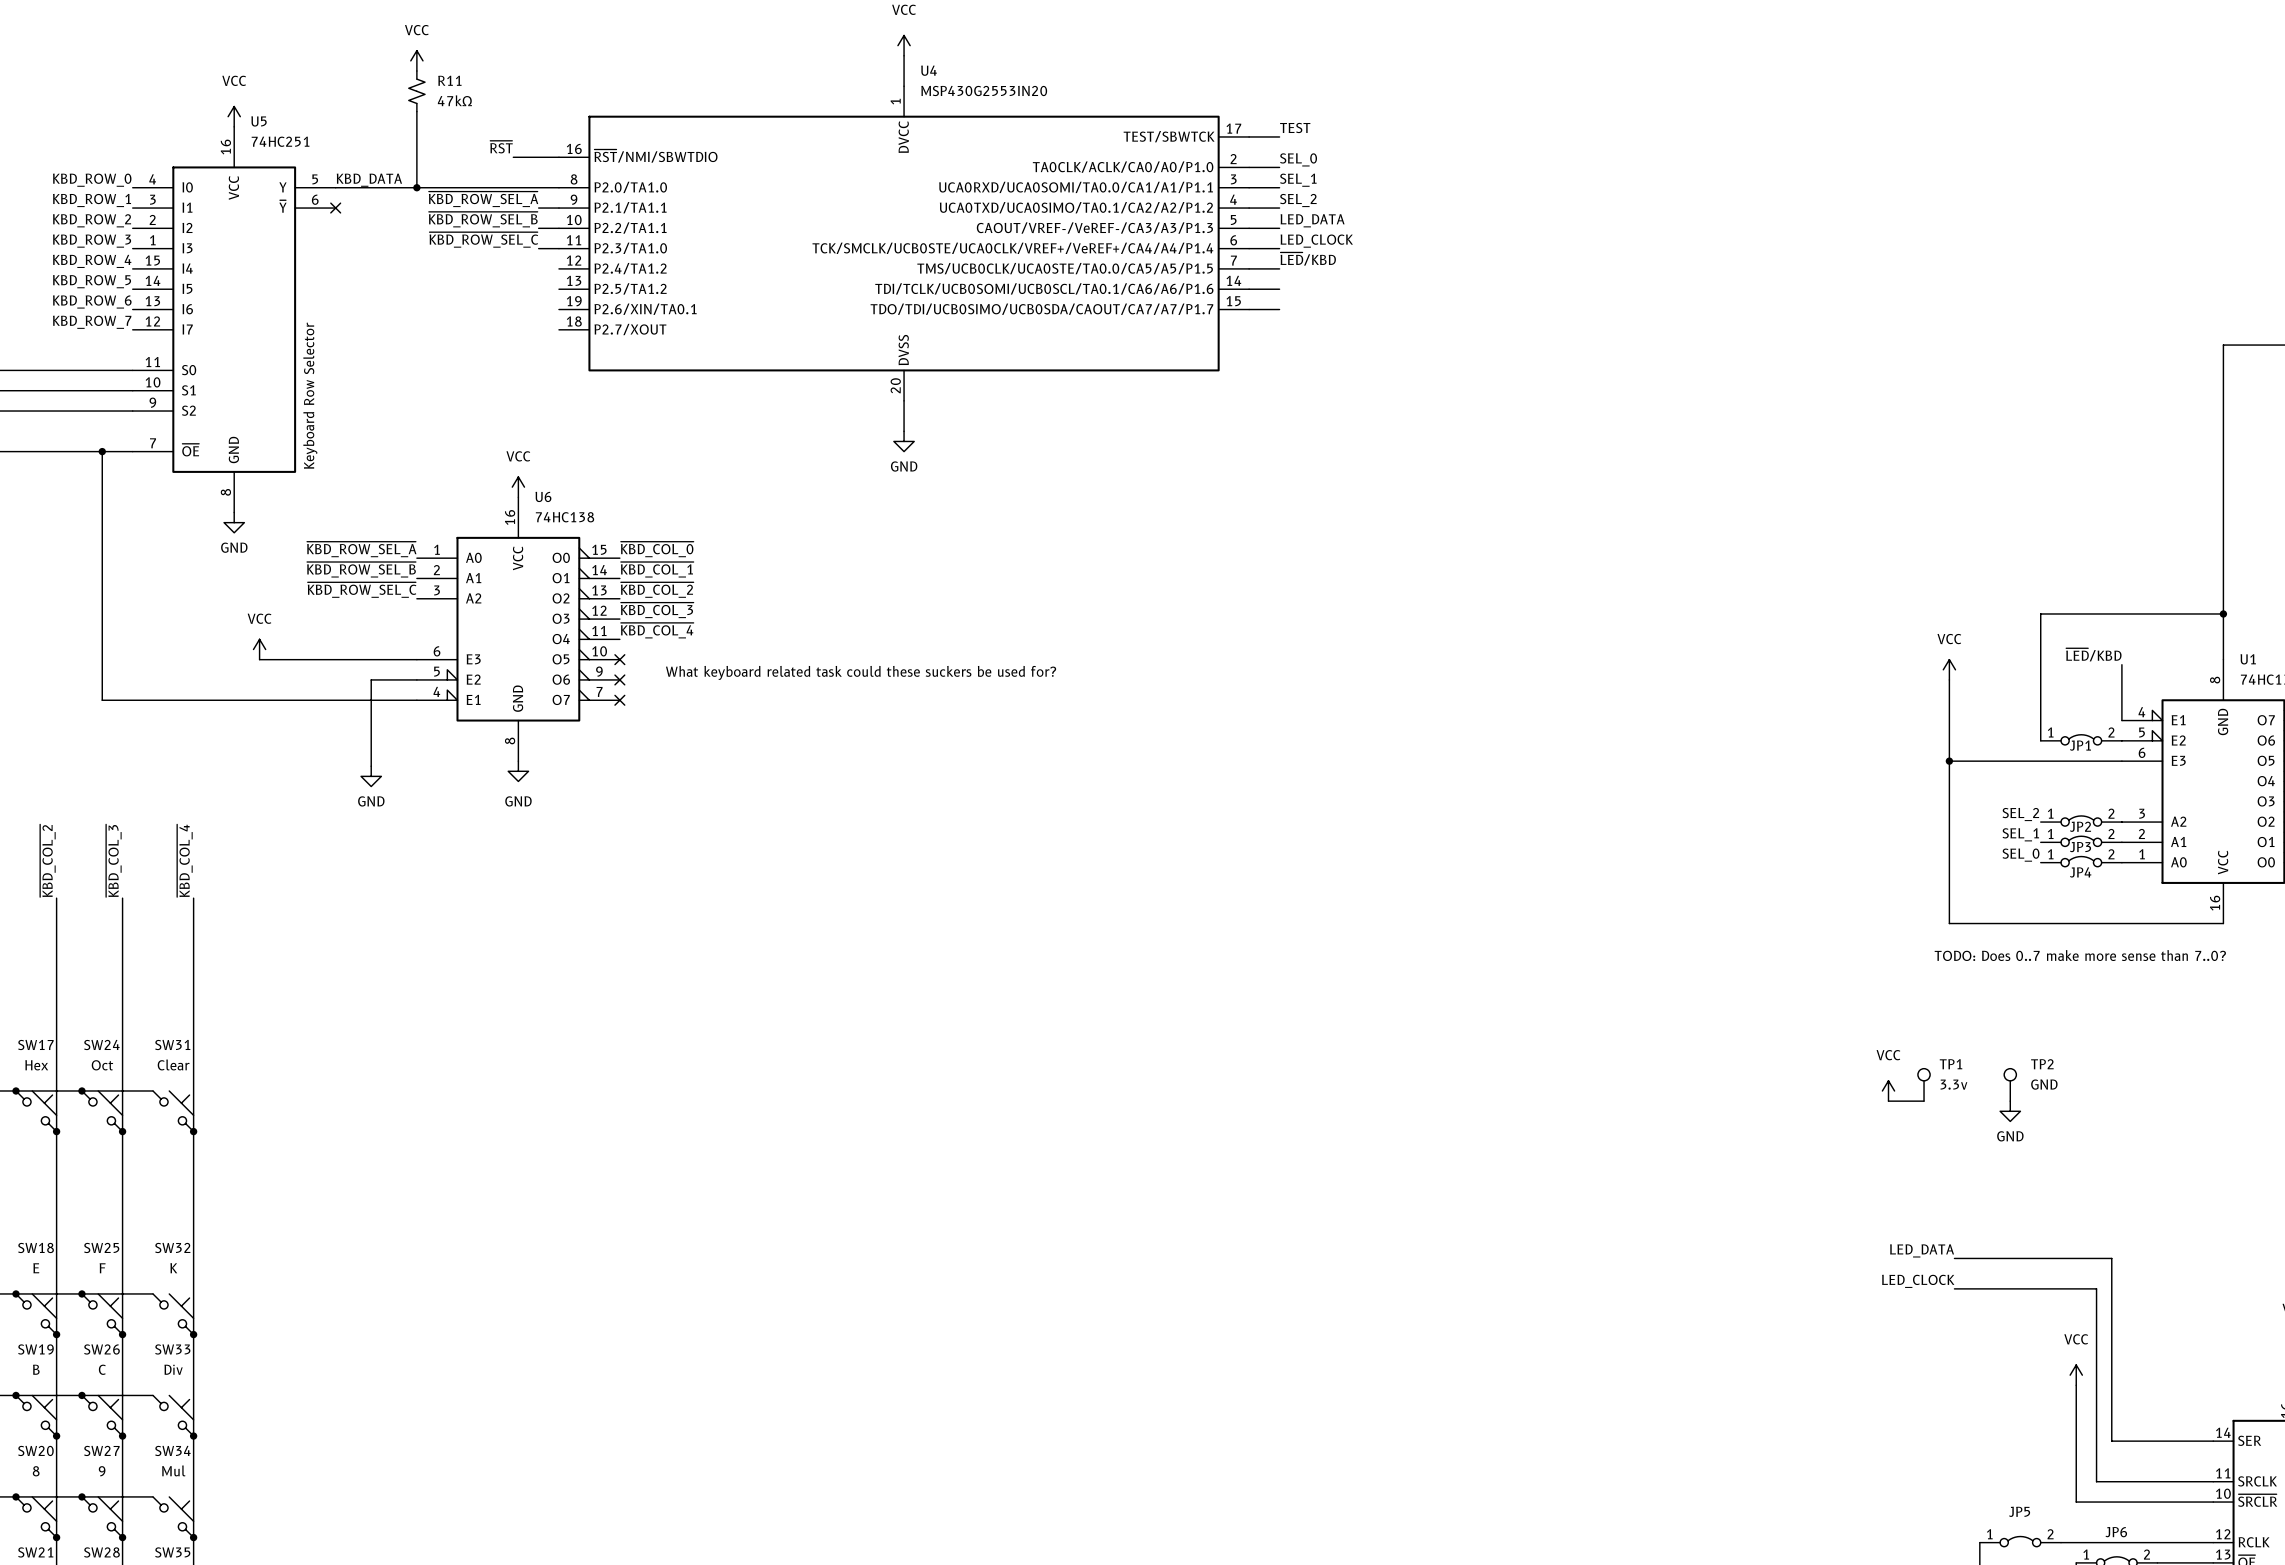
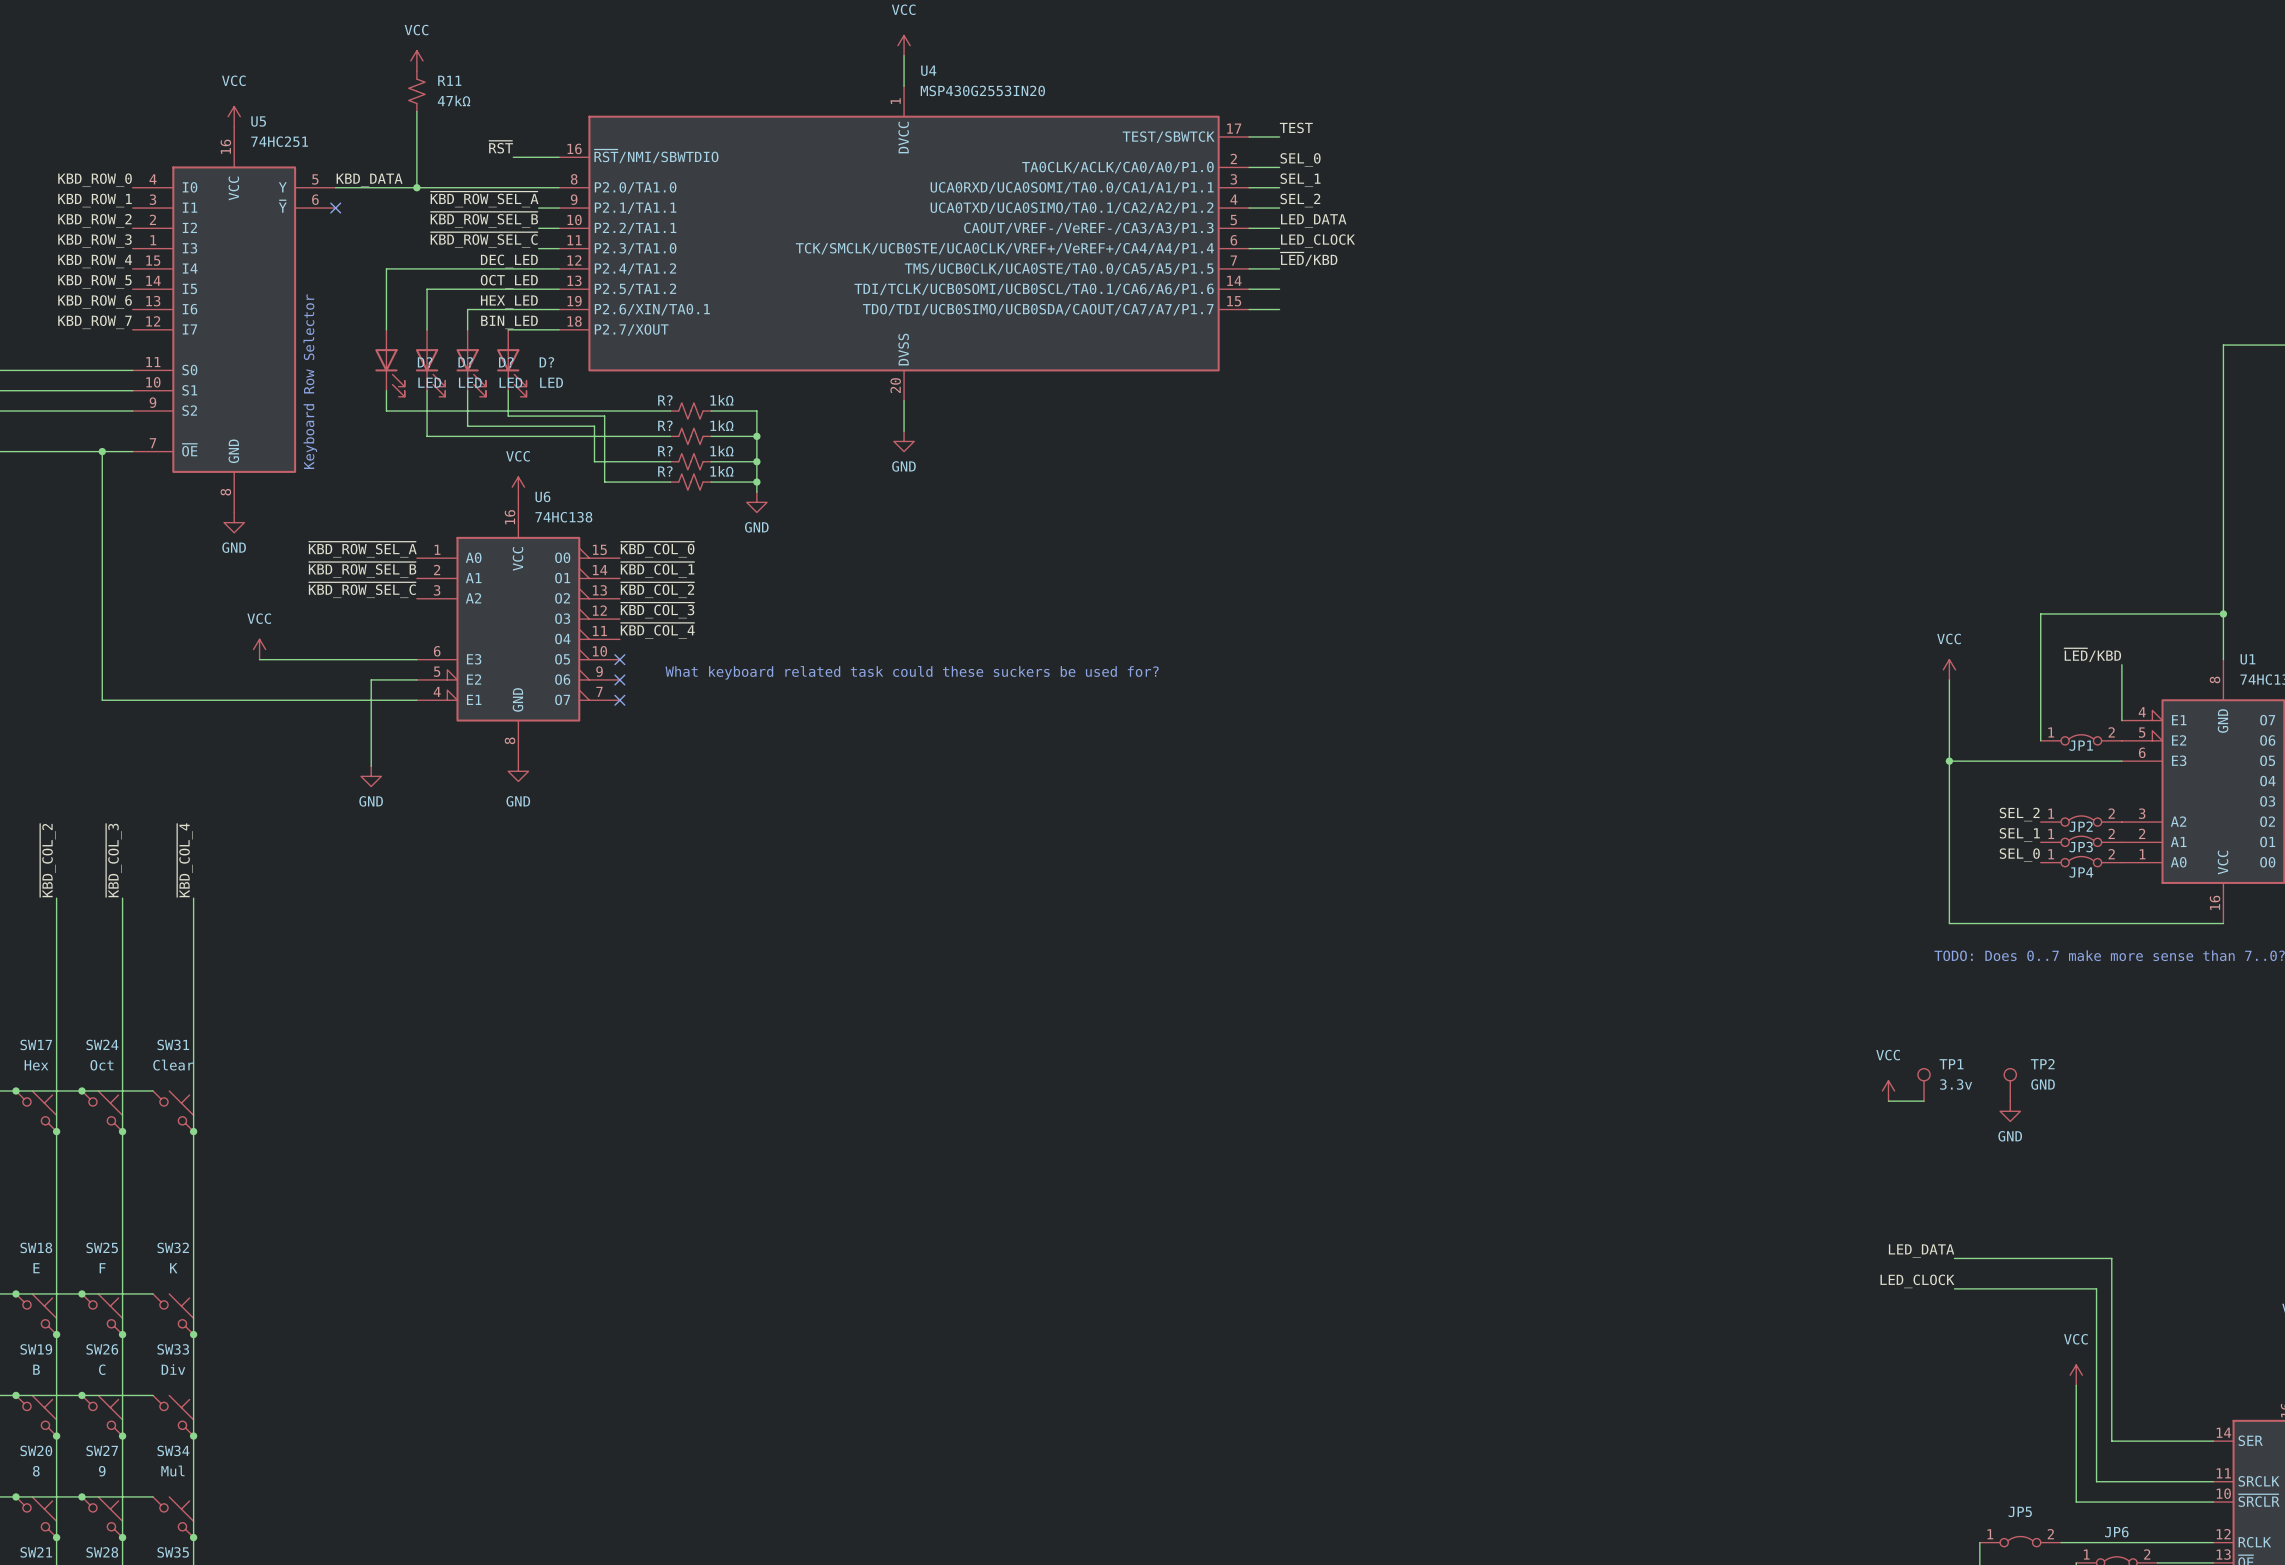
label: none -> DEC_LED (509, 261)
wire: none -> (558, 268) (386, 268) (386, 329)
label: none -> OCT_LED (509, 281)
wire: none -> (558, 289) (427, 289) (427, 329)
label: none -> HEX_LED (509, 302)
wire: none -> (558, 309) (467, 309) (467, 329)
label: none -> BIN_LED (509, 322)
wire: none -> (508, 329) (558, 329)
D?: none -> LED (389, 363)
D?: none -> LED (430, 363)
D?: none -> LED (471, 363)
D?: none -> LED (511, 363)
wire: none -> (386, 390) (386, 411) (670, 411)
wire: none -> (427, 390) (427, 436) (670, 436)
wire: none -> (467, 390) (467, 426) (594, 426) (594, 461) (670, 461)
wire: none -> (508, 390) (508, 416) (604, 416) (604, 482) (670, 482)
R?: none -> 1kΩ (690, 411)
wire: none -> (711, 411) (756, 411) (756, 492)
R?: none -> 1kΩ (690, 436)
wire: none -> (711, 436) (756, 436)
junction: none -> (756, 436)
R?: none -> 1kΩ (690, 461)
wire: none -> (711, 461) (756, 461)
junction: none -> (756, 461)
R?: none -> 1kΩ (690, 482)
wire: none -> (711, 482) (756, 482)
junction: none -> (756, 482)
power symbol: none -> GND (756, 502)

